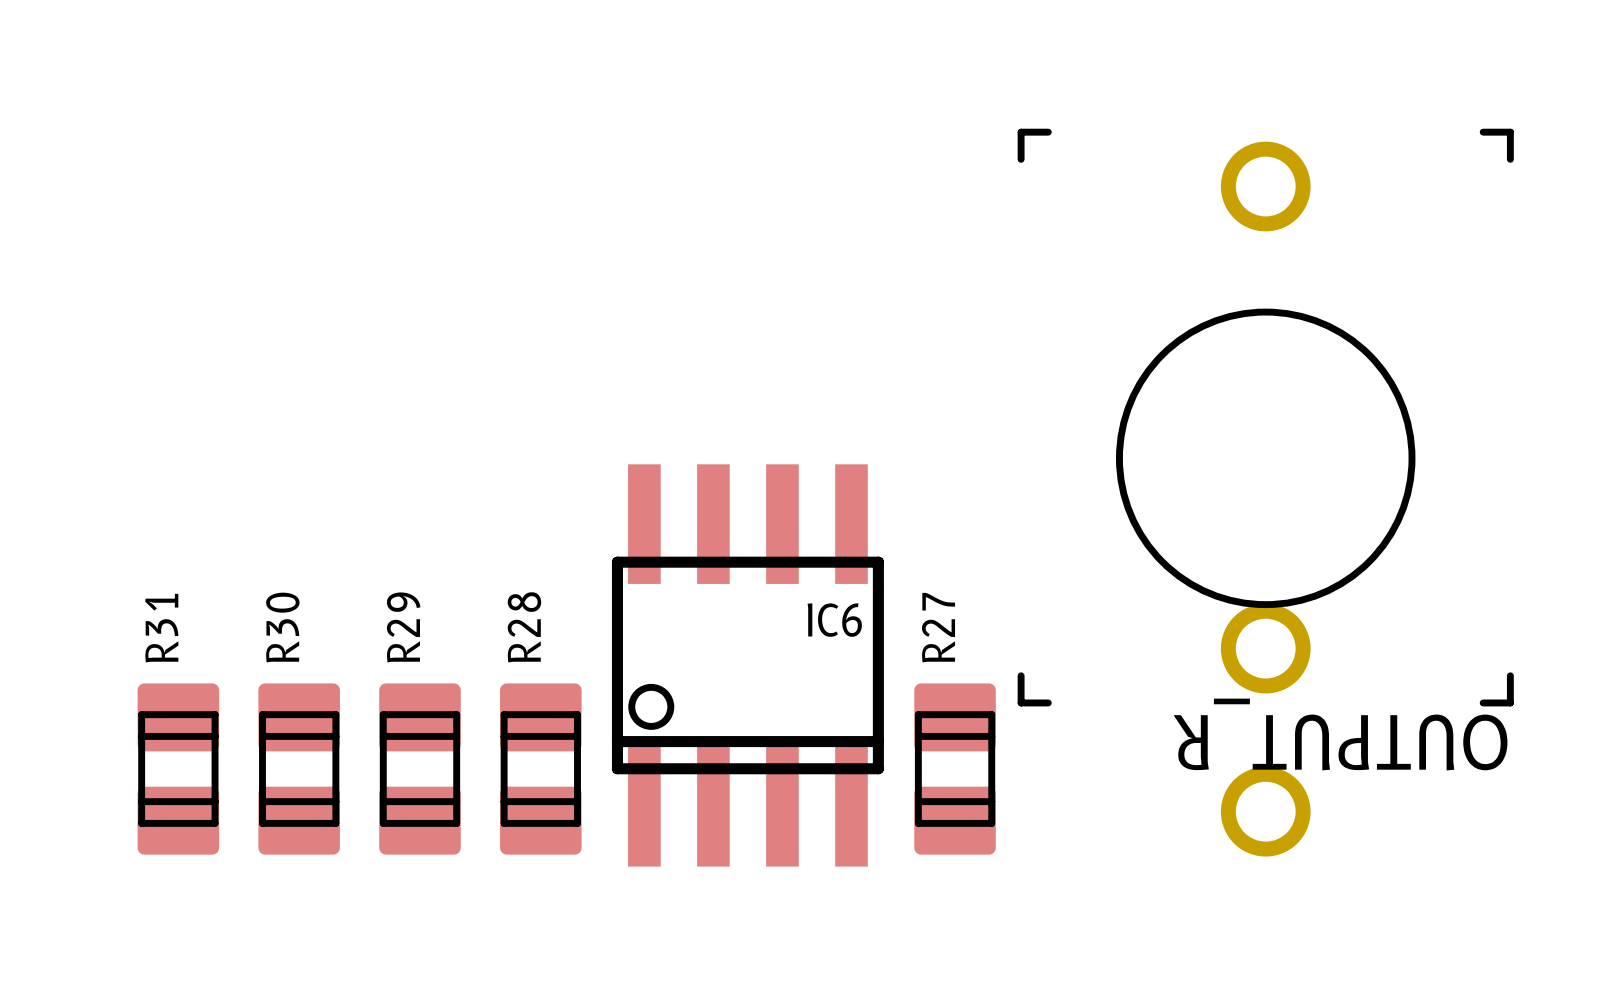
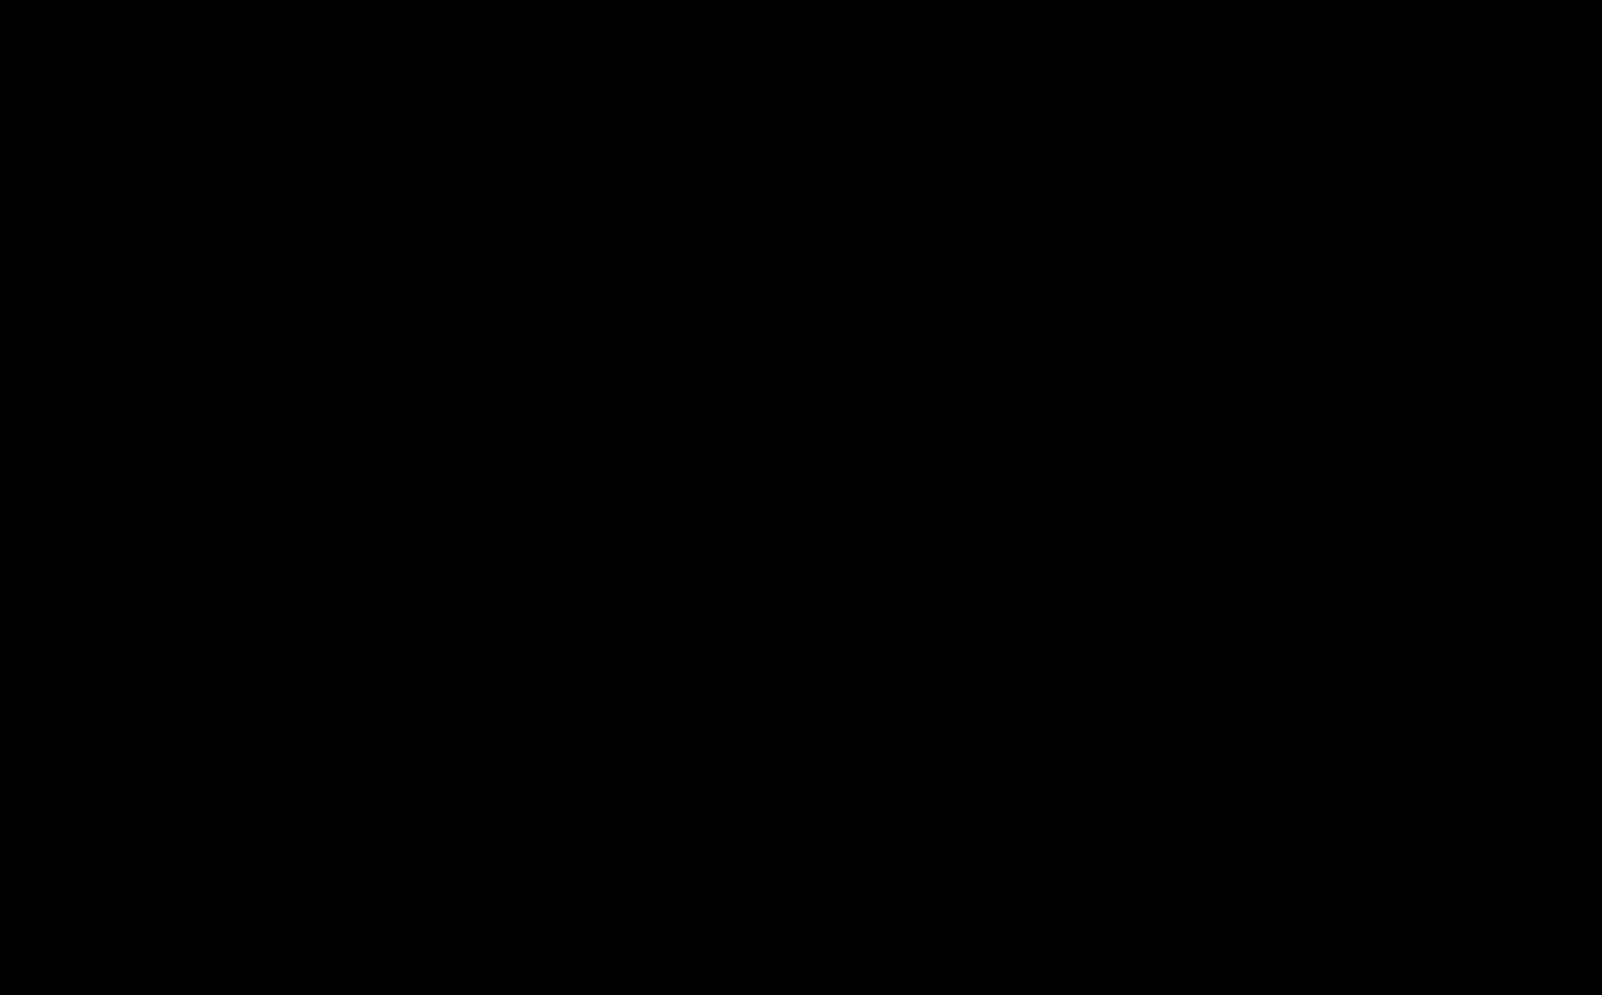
OUTPUT_R: (1265, 492) -> none
IC6: (747, 665) -> none
R31: (178, 769) -> none
R30: (299, 769) -> none
R29: (419, 769) -> none
R28: (540, 769) -> none
R27: (955, 769) -> none

